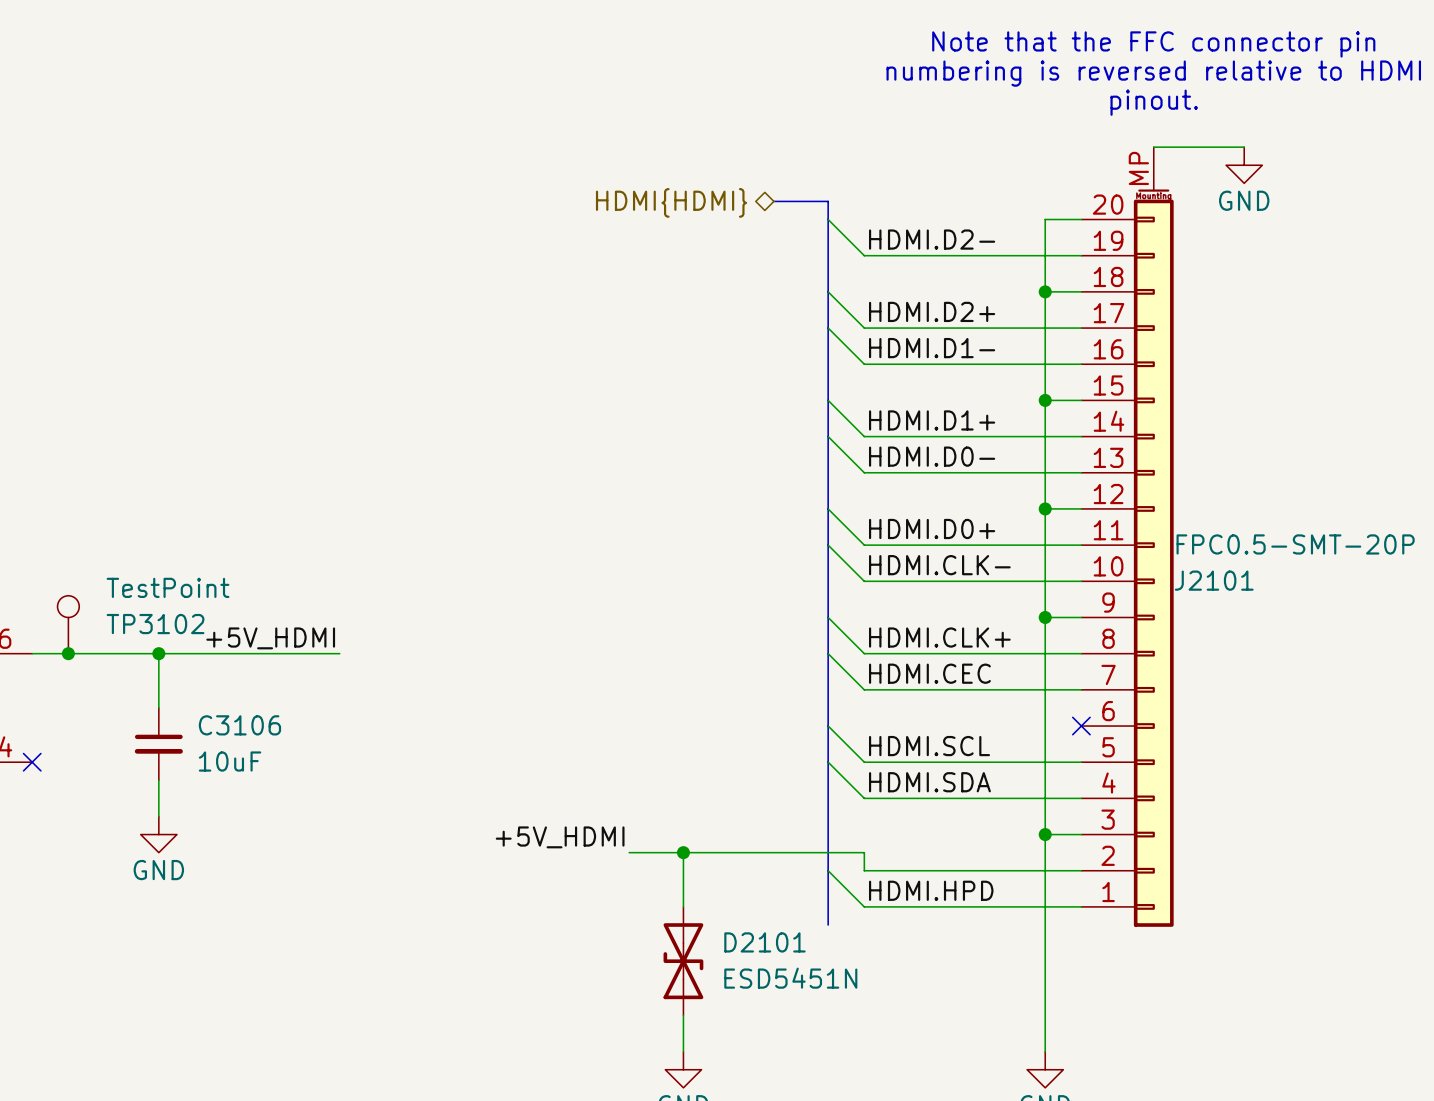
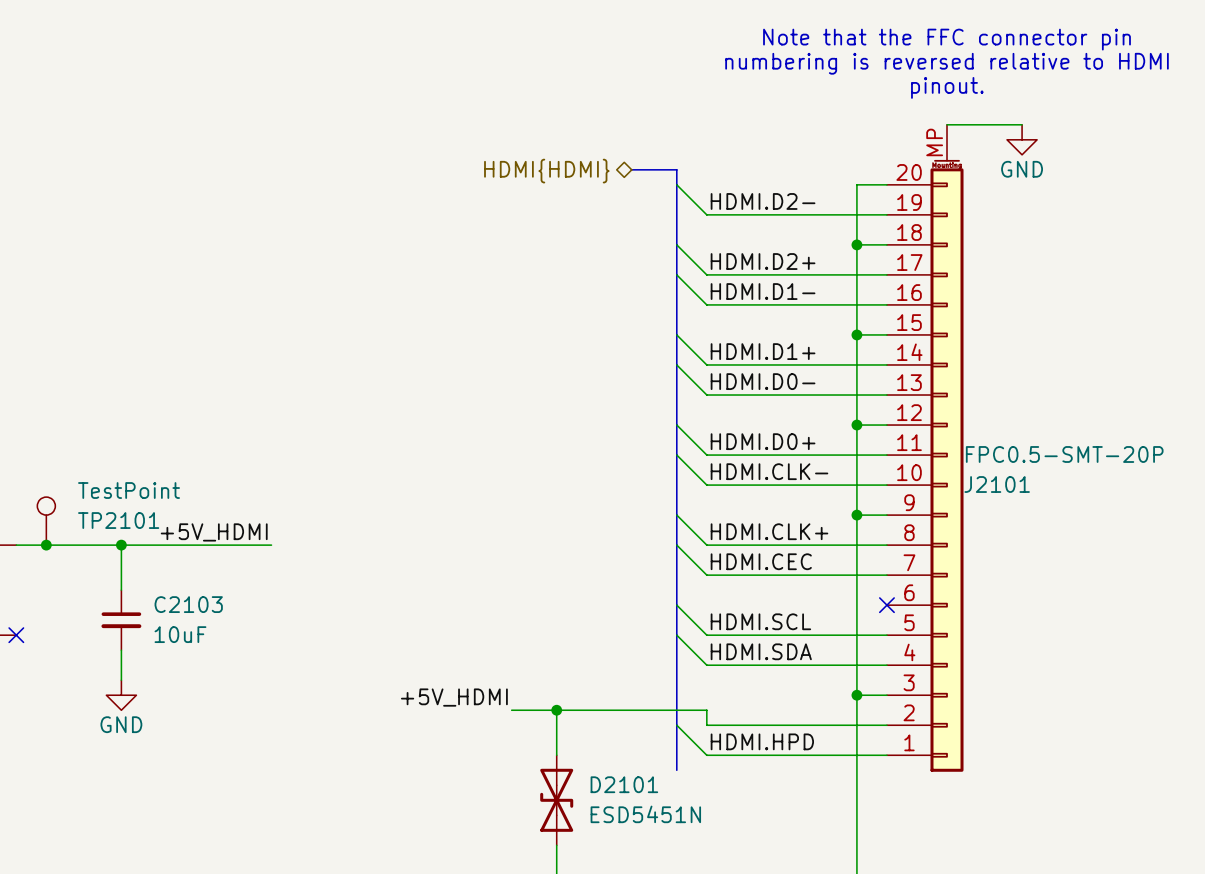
TP3102 name: TP3102 (155, 624) -> TP2101 (118, 520)
C3106 name: C3106 (239, 725) -> C2103 (188, 604)

